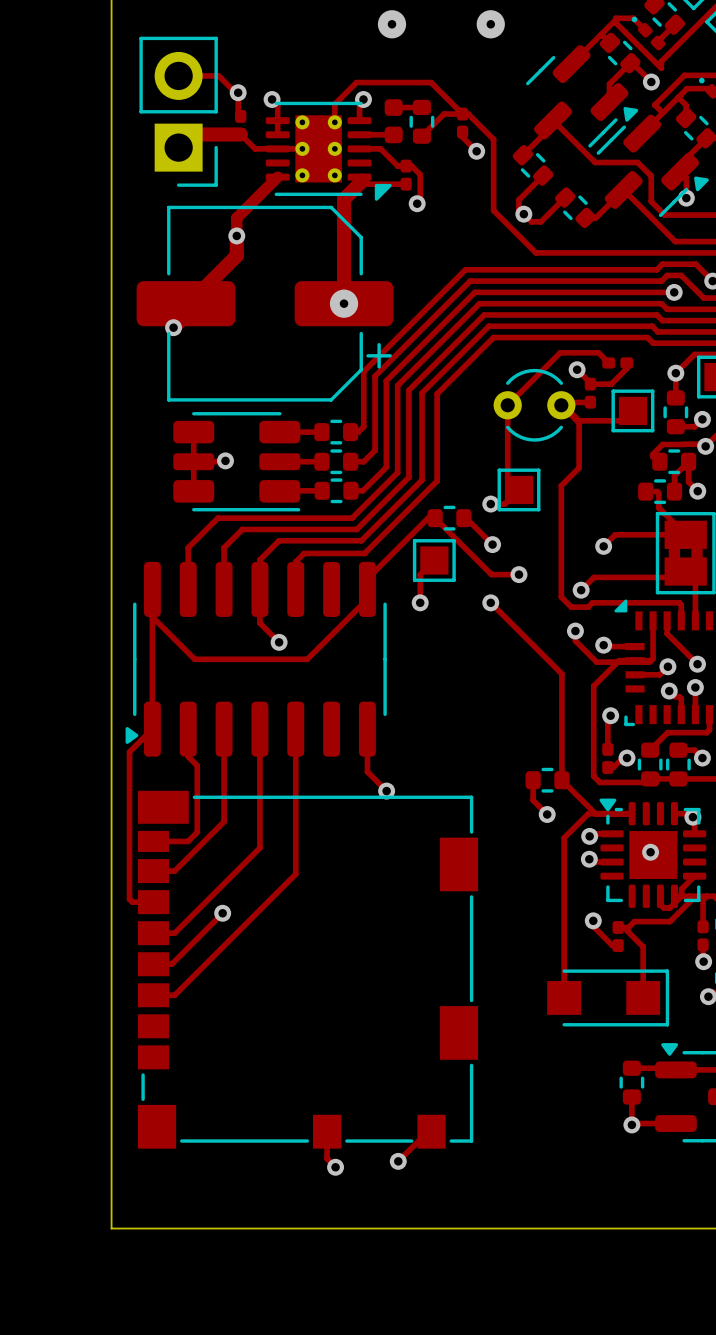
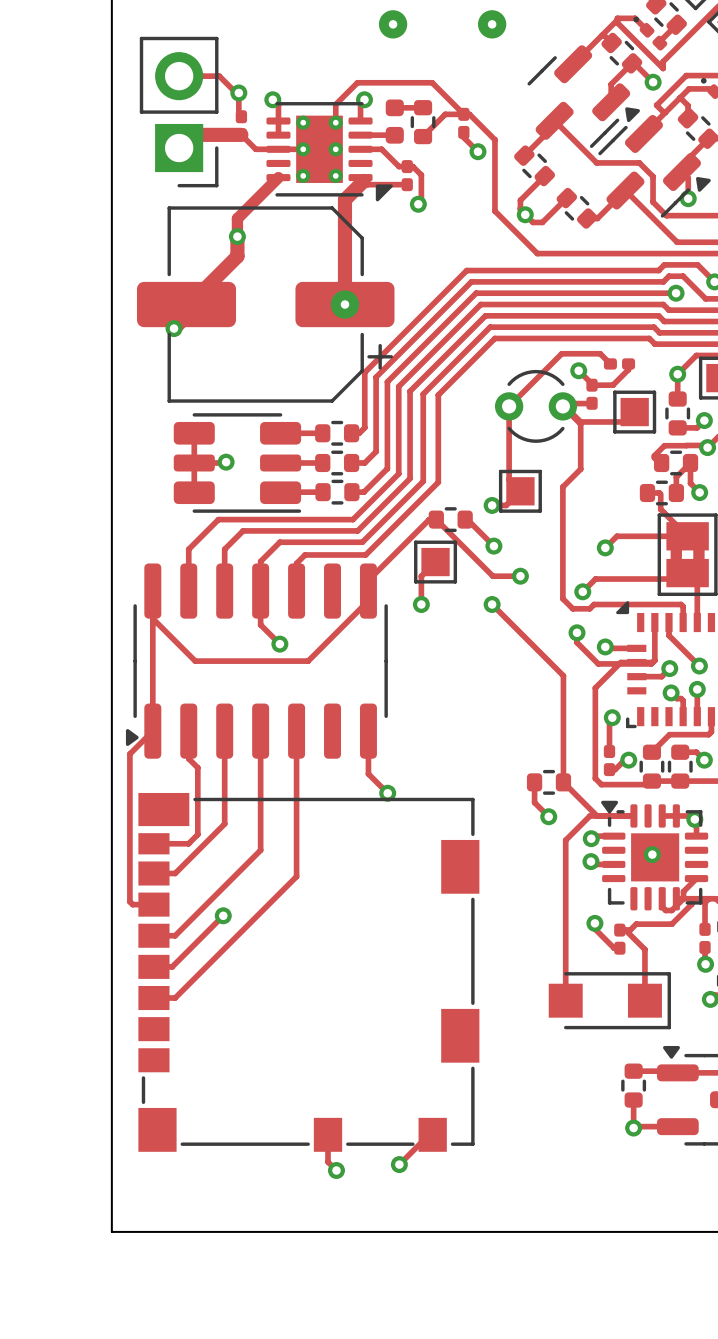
track: none -> (662, 815) (676, 815)

